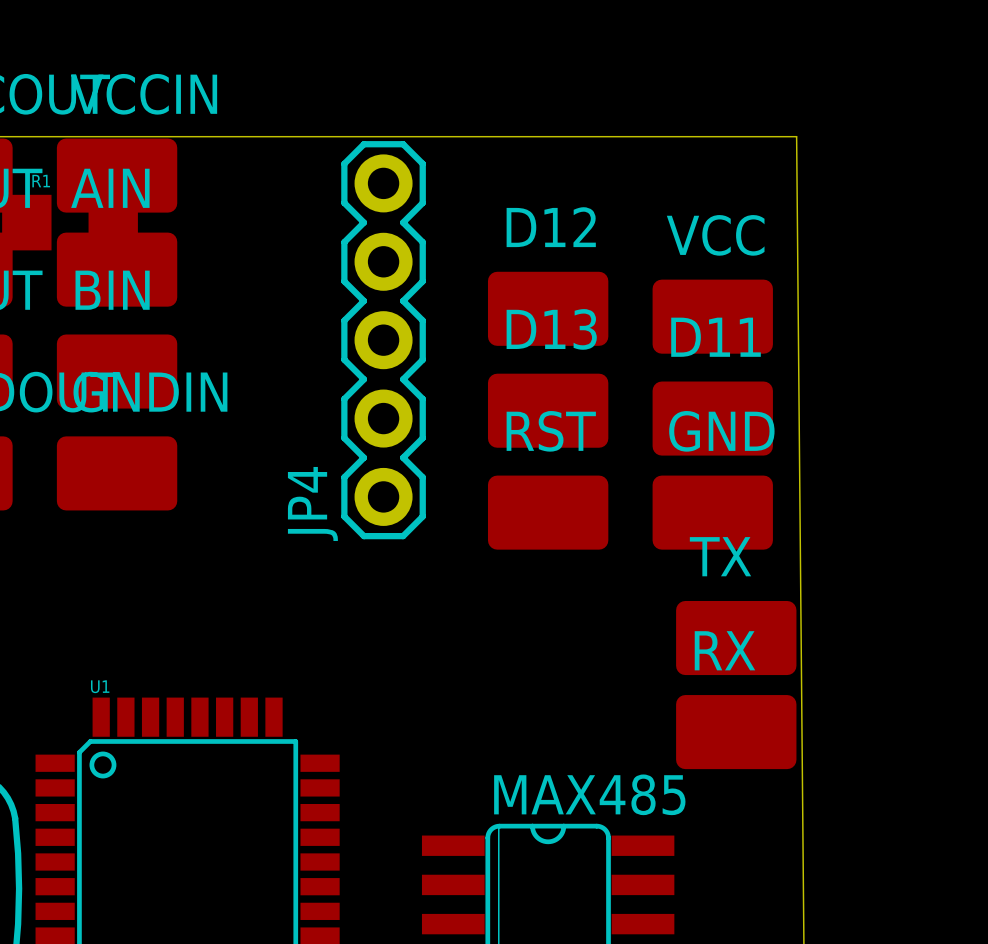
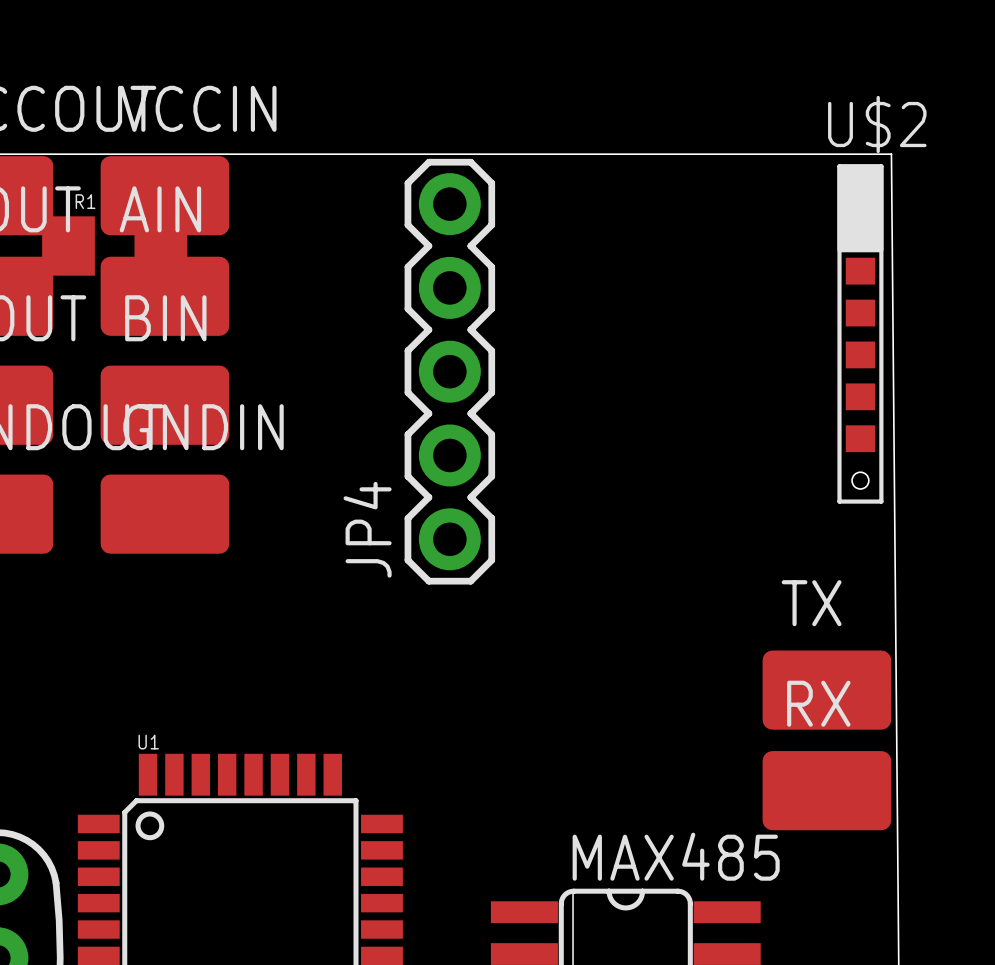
U$2: none -> (860, 333)
D12: (548, 308) -> none
VCC: (712, 316) -> none
D13: (548, 410) -> none
D11: (712, 418) -> none
RST: (548, 512) -> none
GND: (712, 512) -> none

